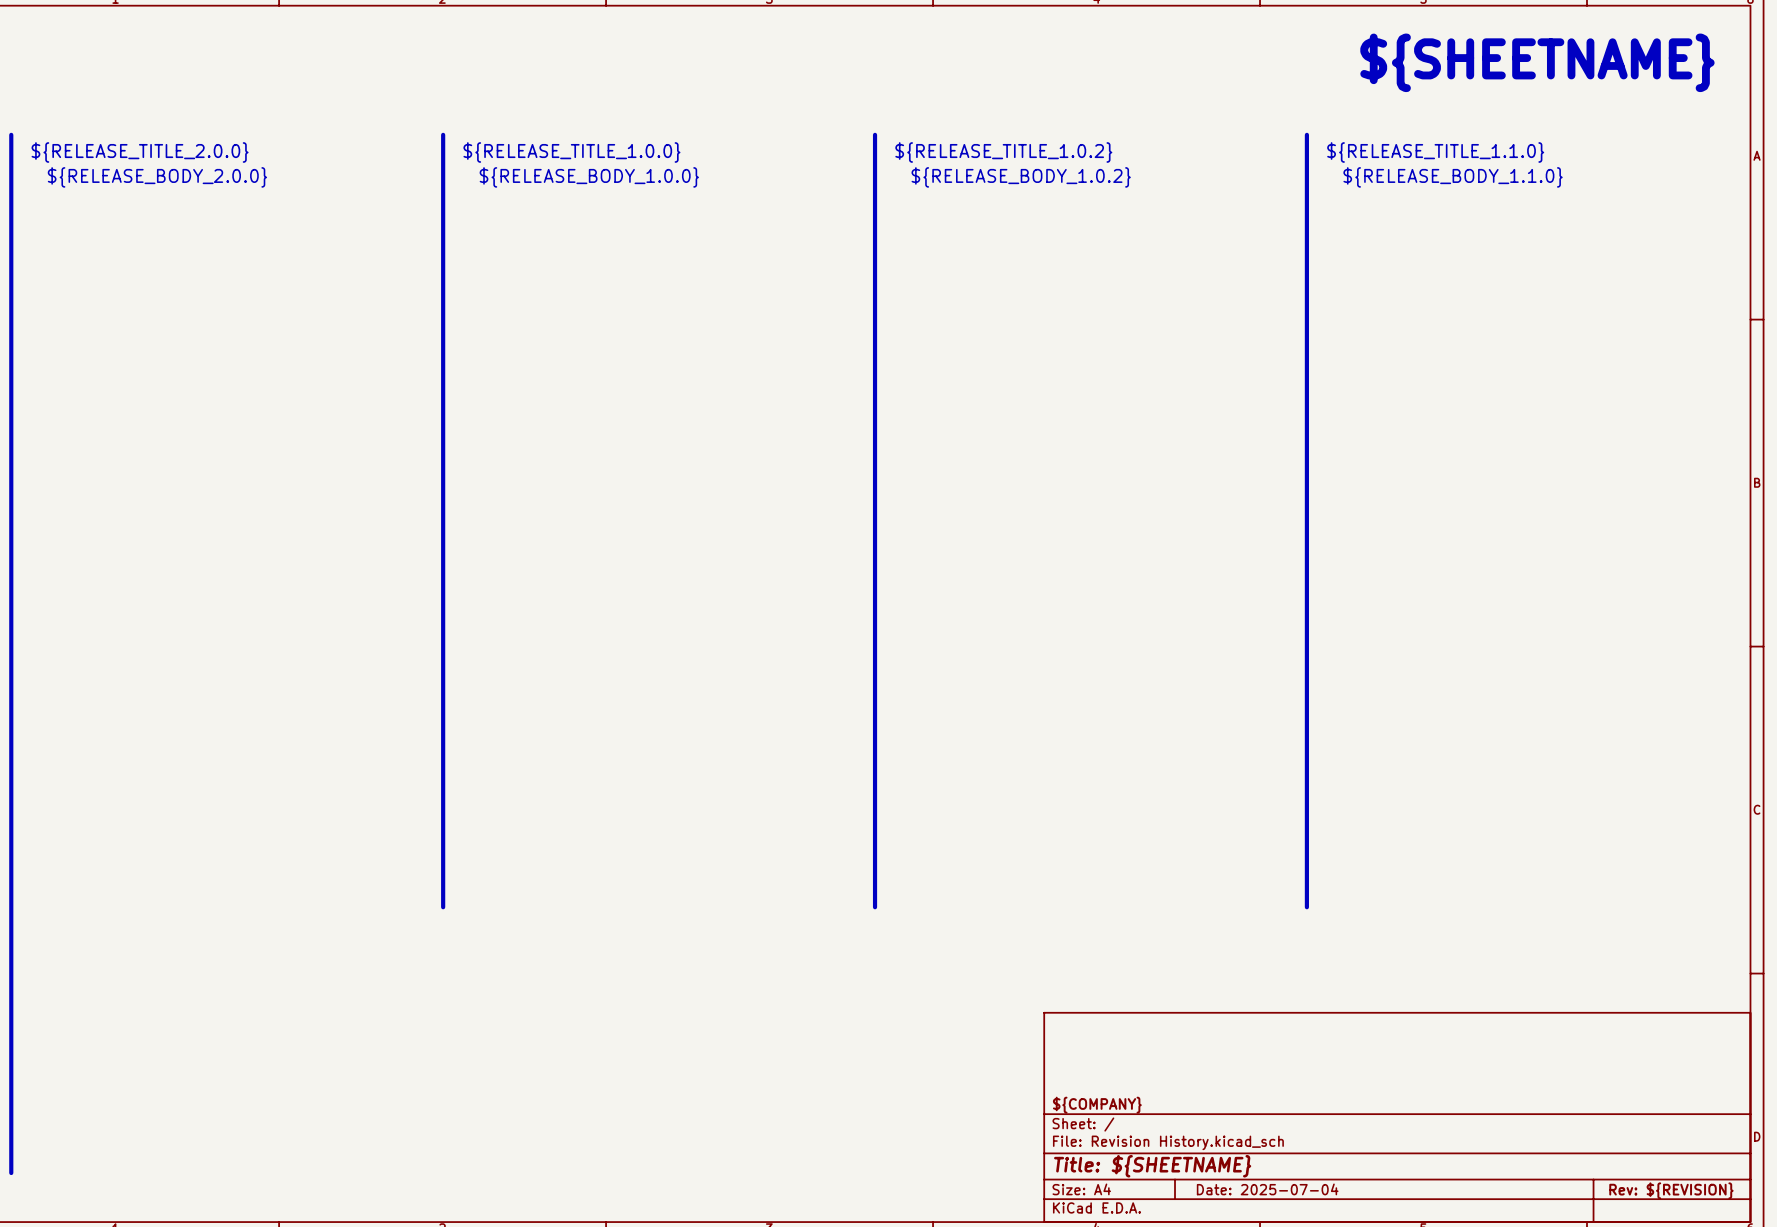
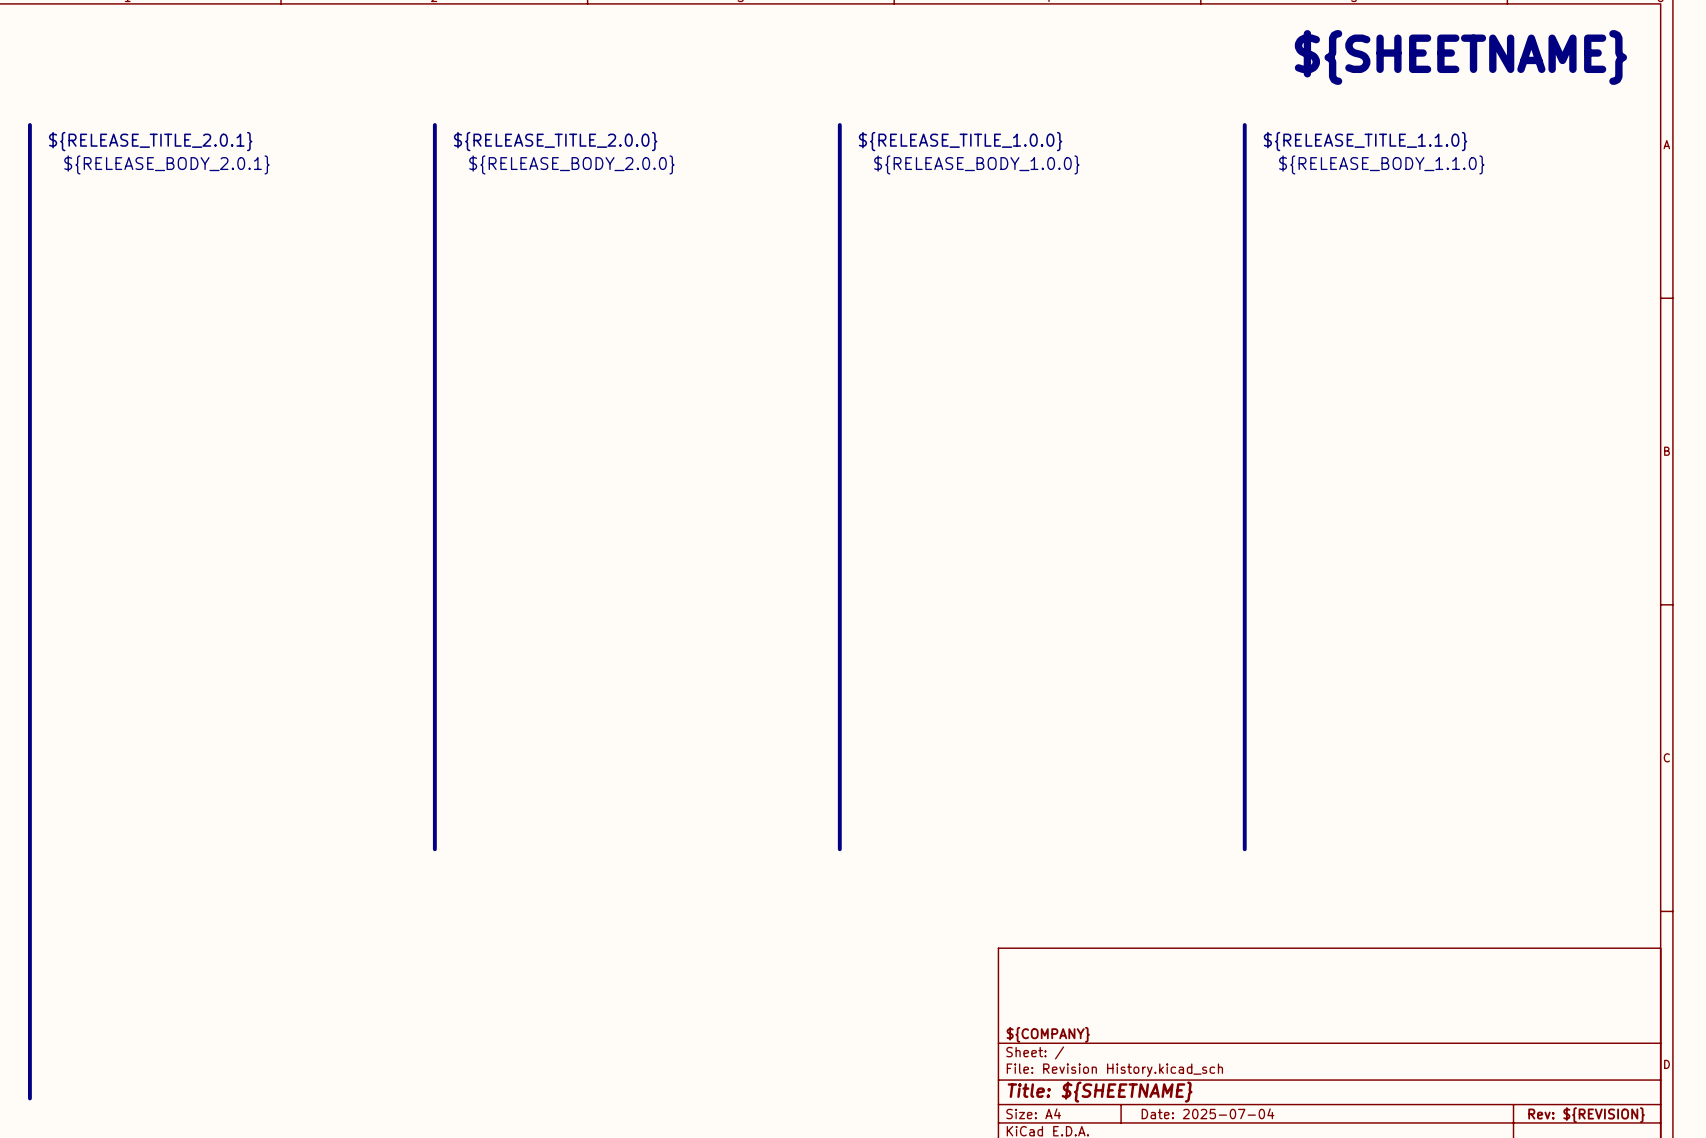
text: ${RELEASE_TITLE_2.0.0} (140, 152) -> ${RELEASE_TITLE_2.0.1} (150, 141)
text: ${RELEASE_TITLE_1.0.0} (571, 152) -> ${RELEASE_TITLE_2.0.0} (555, 141)
text: ${RELEASE_TITLE_1.0.2} (1003, 152) -> ${RELEASE_TITLE_1.0.0} (960, 141)
text: ${RELEASE_BODY_2.0.0} (157, 177) -> ${RELEASE_BODY_2.0.1} (166, 164)
text: ${RELEASE_BODY_1.0.0} (589, 177) -> ${RELEASE_BODY_2.0.0} (571, 164)
text: ${RELEASE_BODY_1.0.2} (1021, 177) -> ${RELEASE_BODY_1.0.0} (976, 164)

